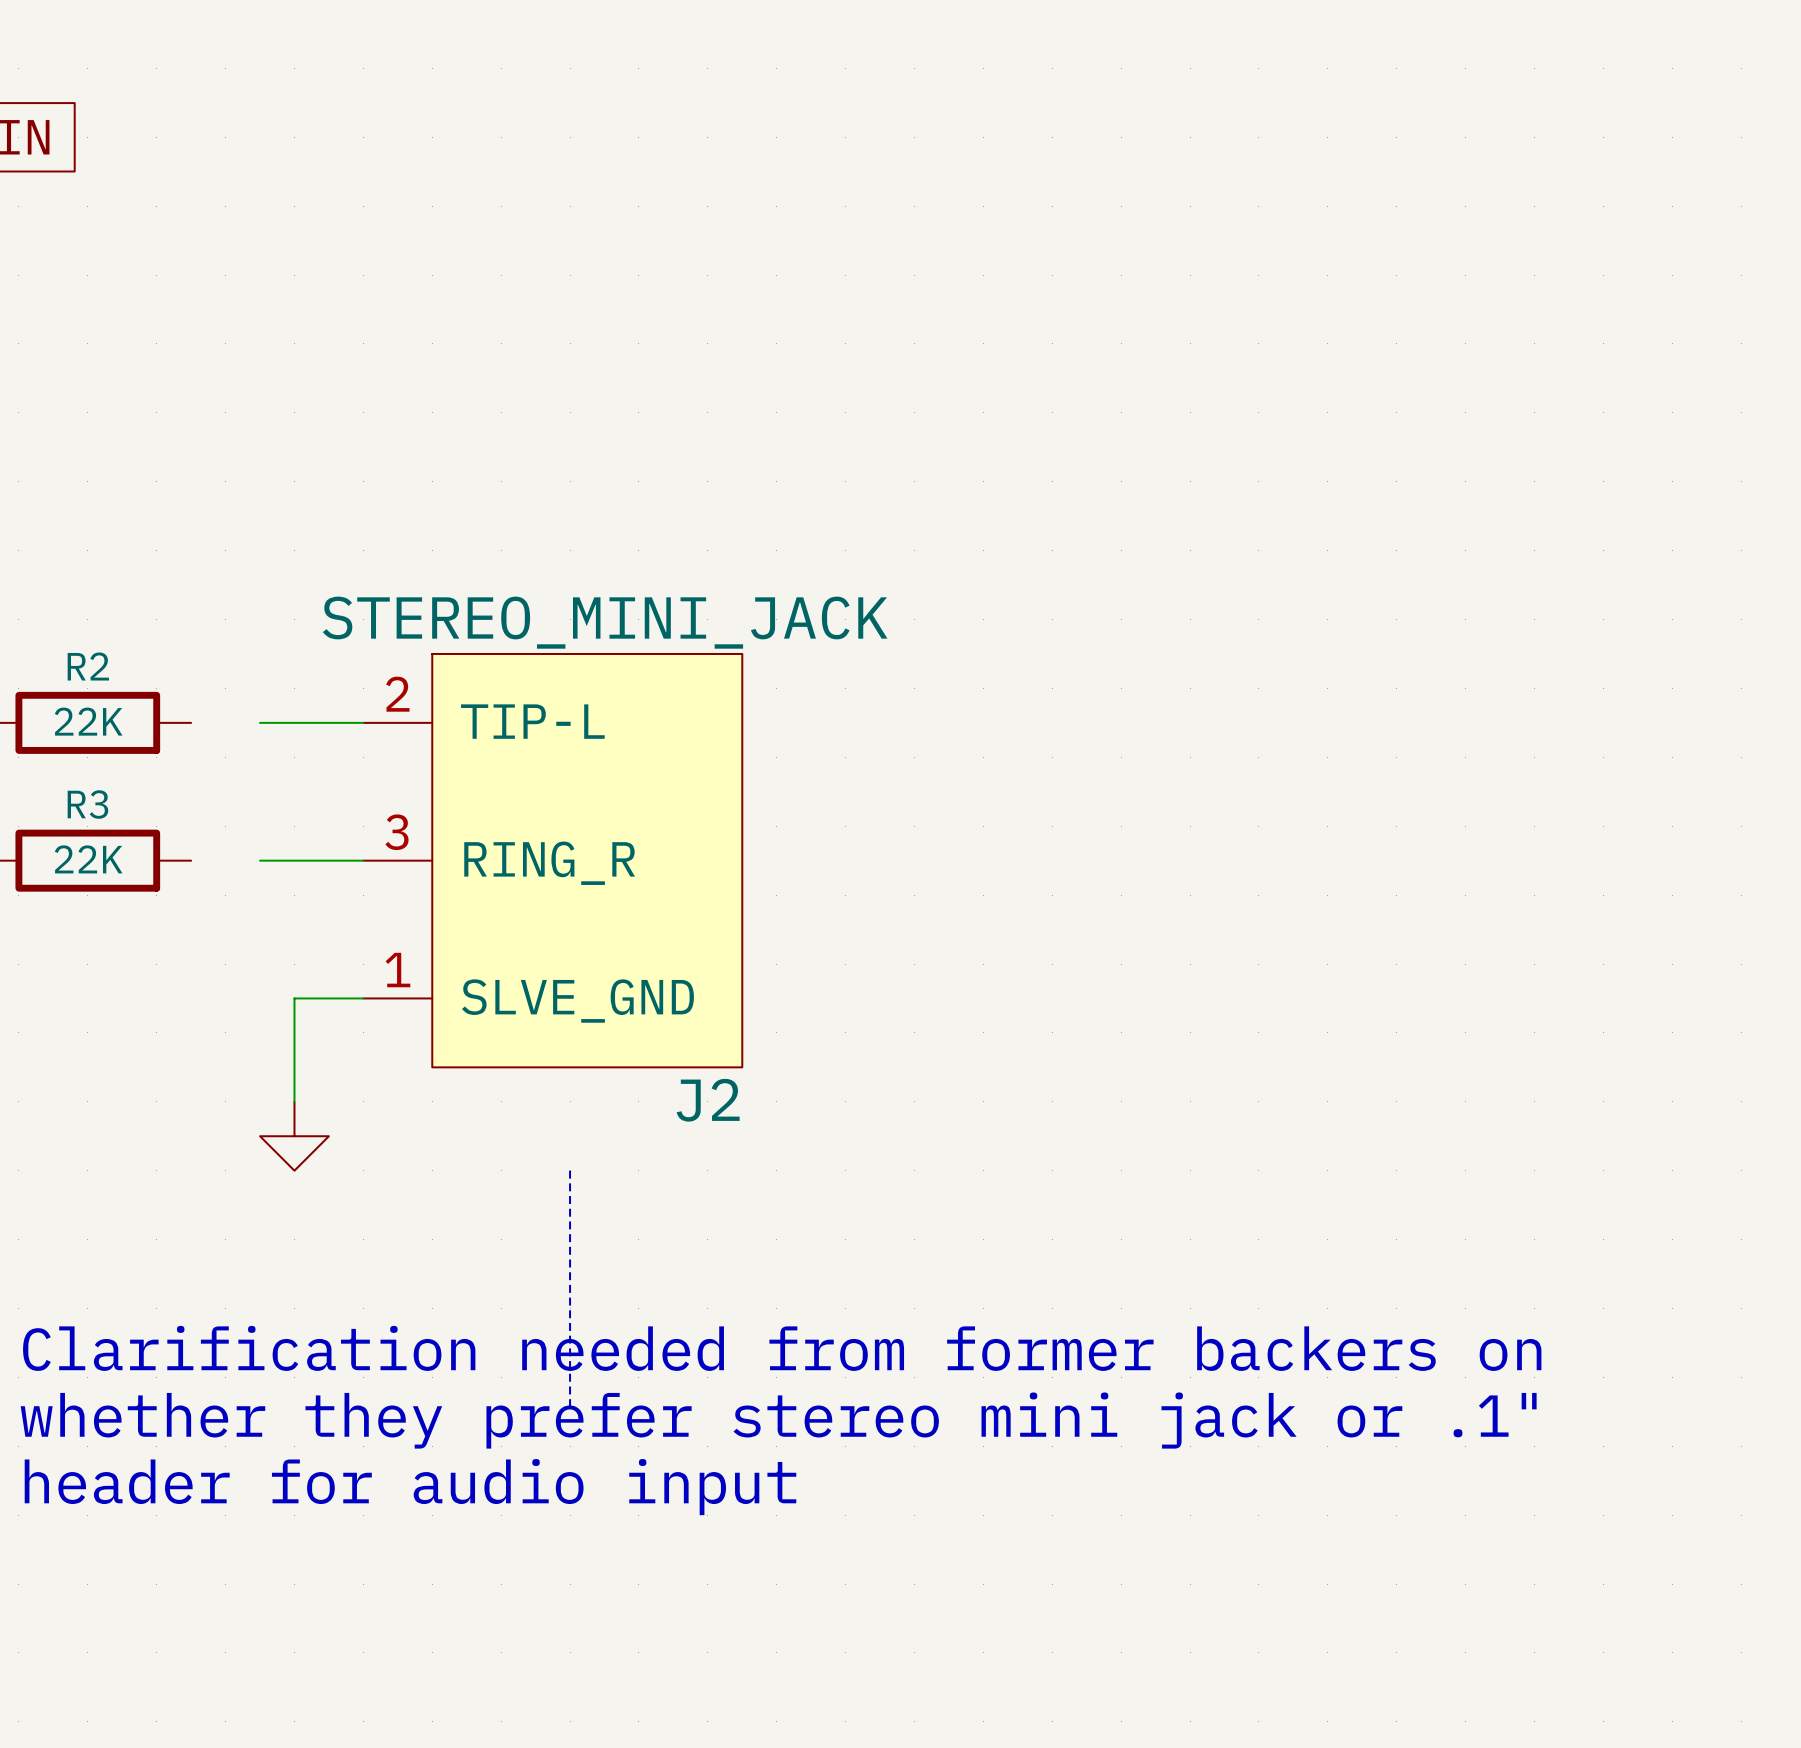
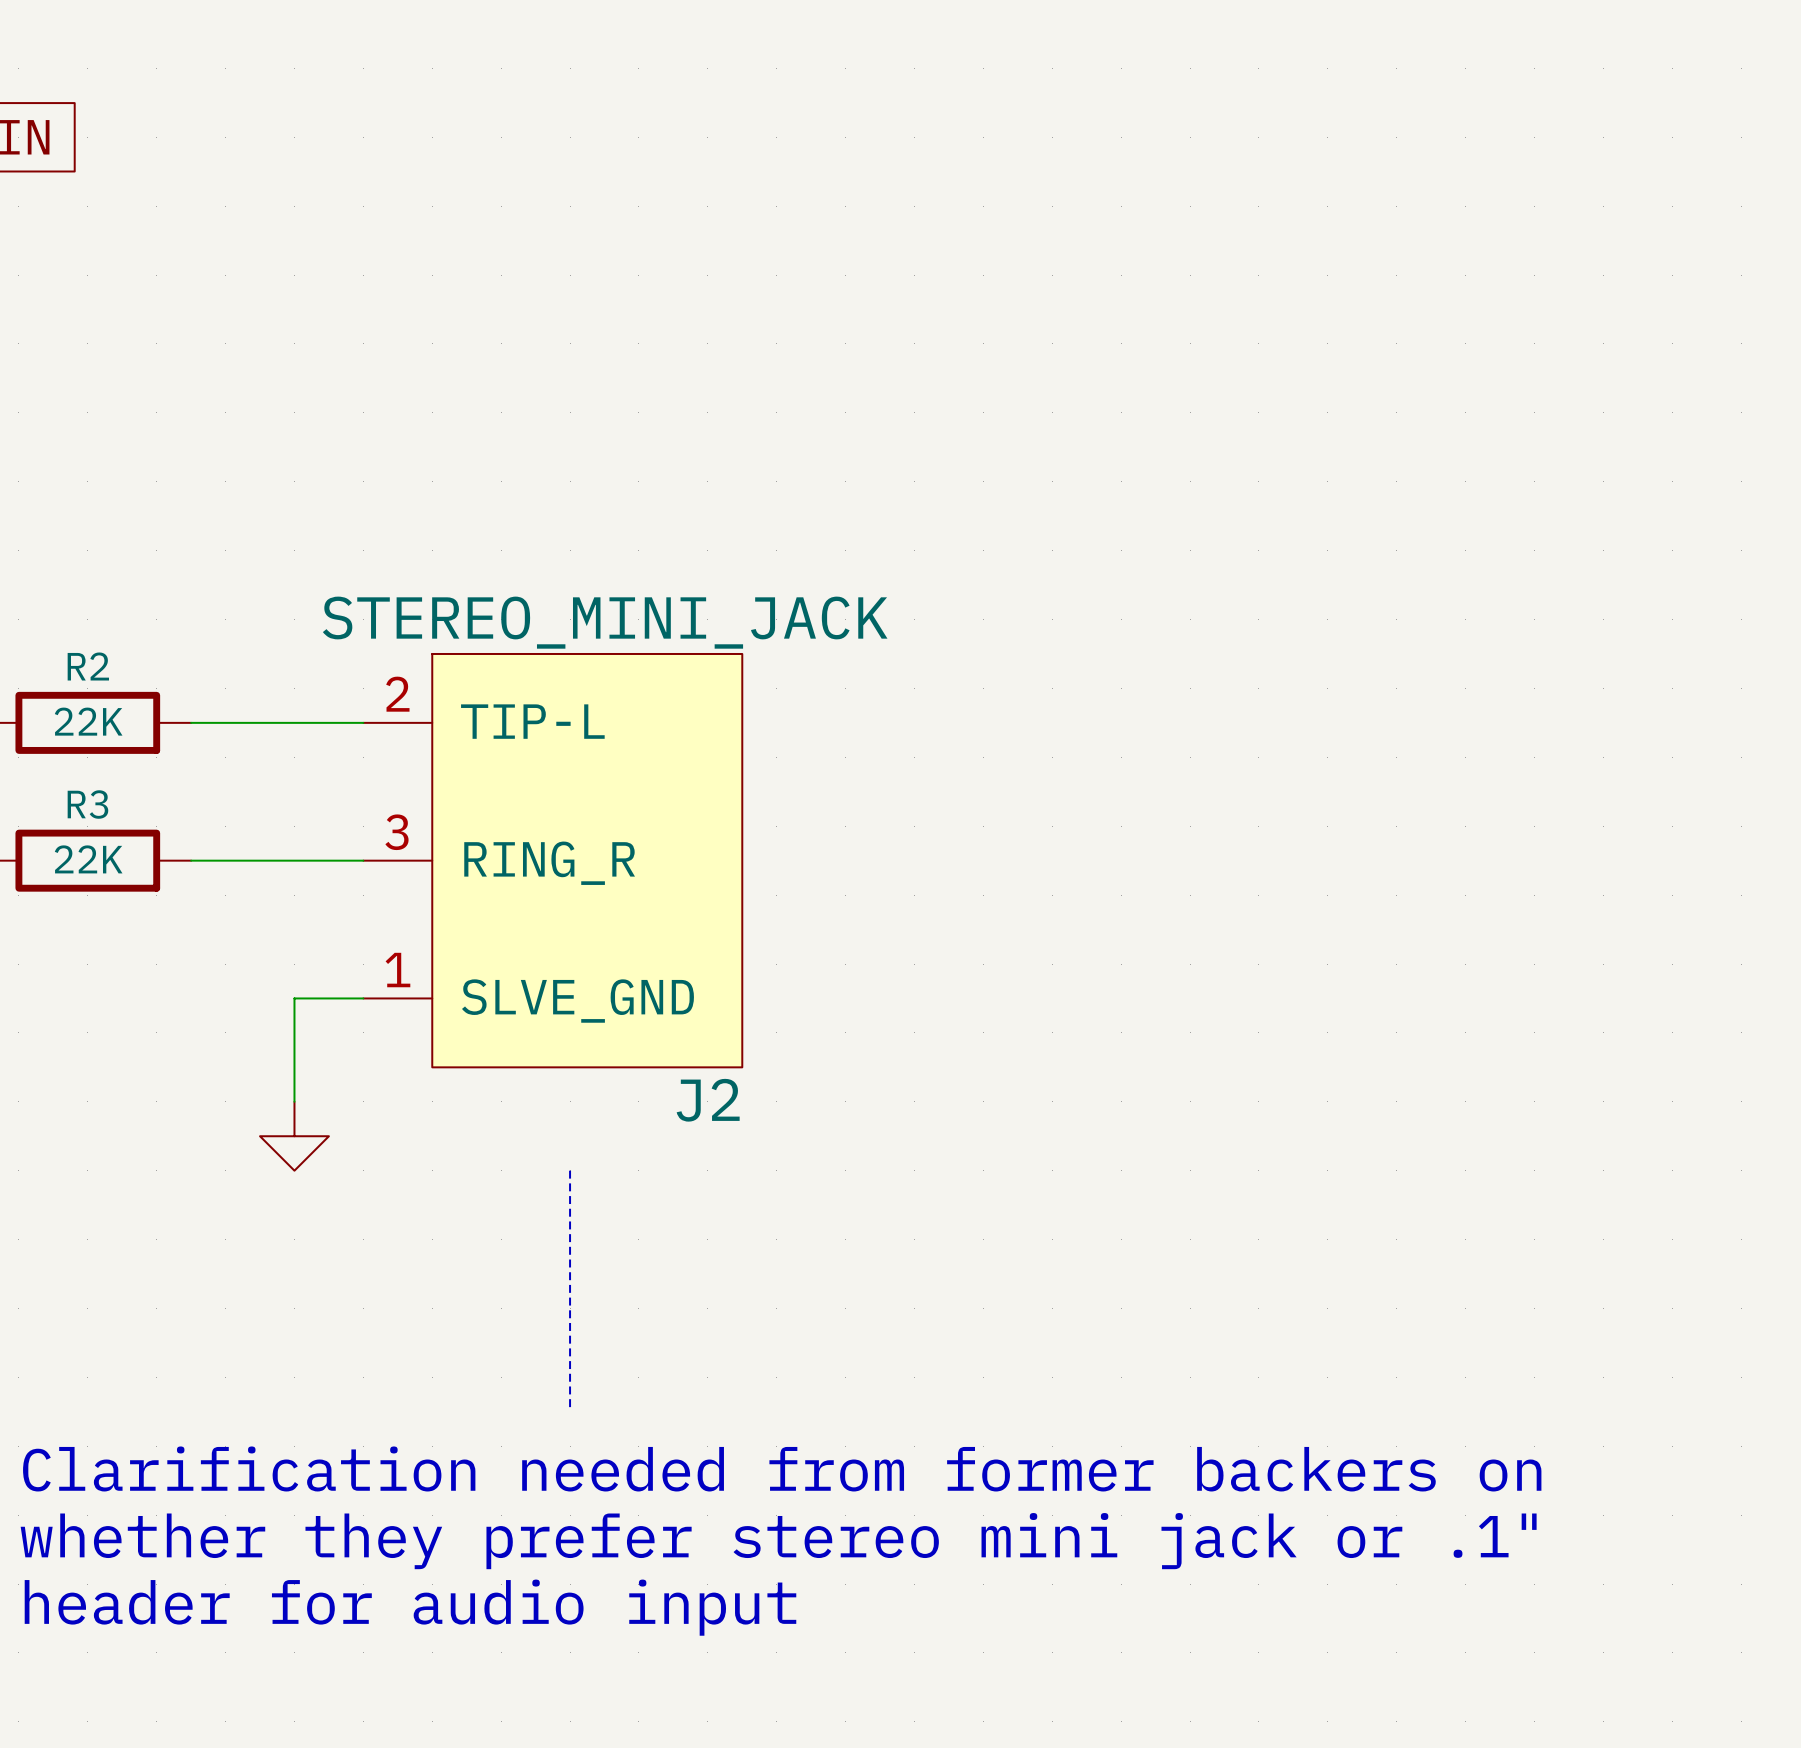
wire: none -> (191, 722) (260, 722)
wire: none -> (191, 860) (260, 860)
text position: Clarification needed from former backers on (782, 1348) -> Clarification needed from former backers on (782, 1468)
text position: whether they prefer stereo mini jack or .1" (778, 1420) -> whether they prefer stereo mini jack or .1" (778, 1541)
text position: header for audio input (410, 1487) -> header for audio input (410, 1607)

